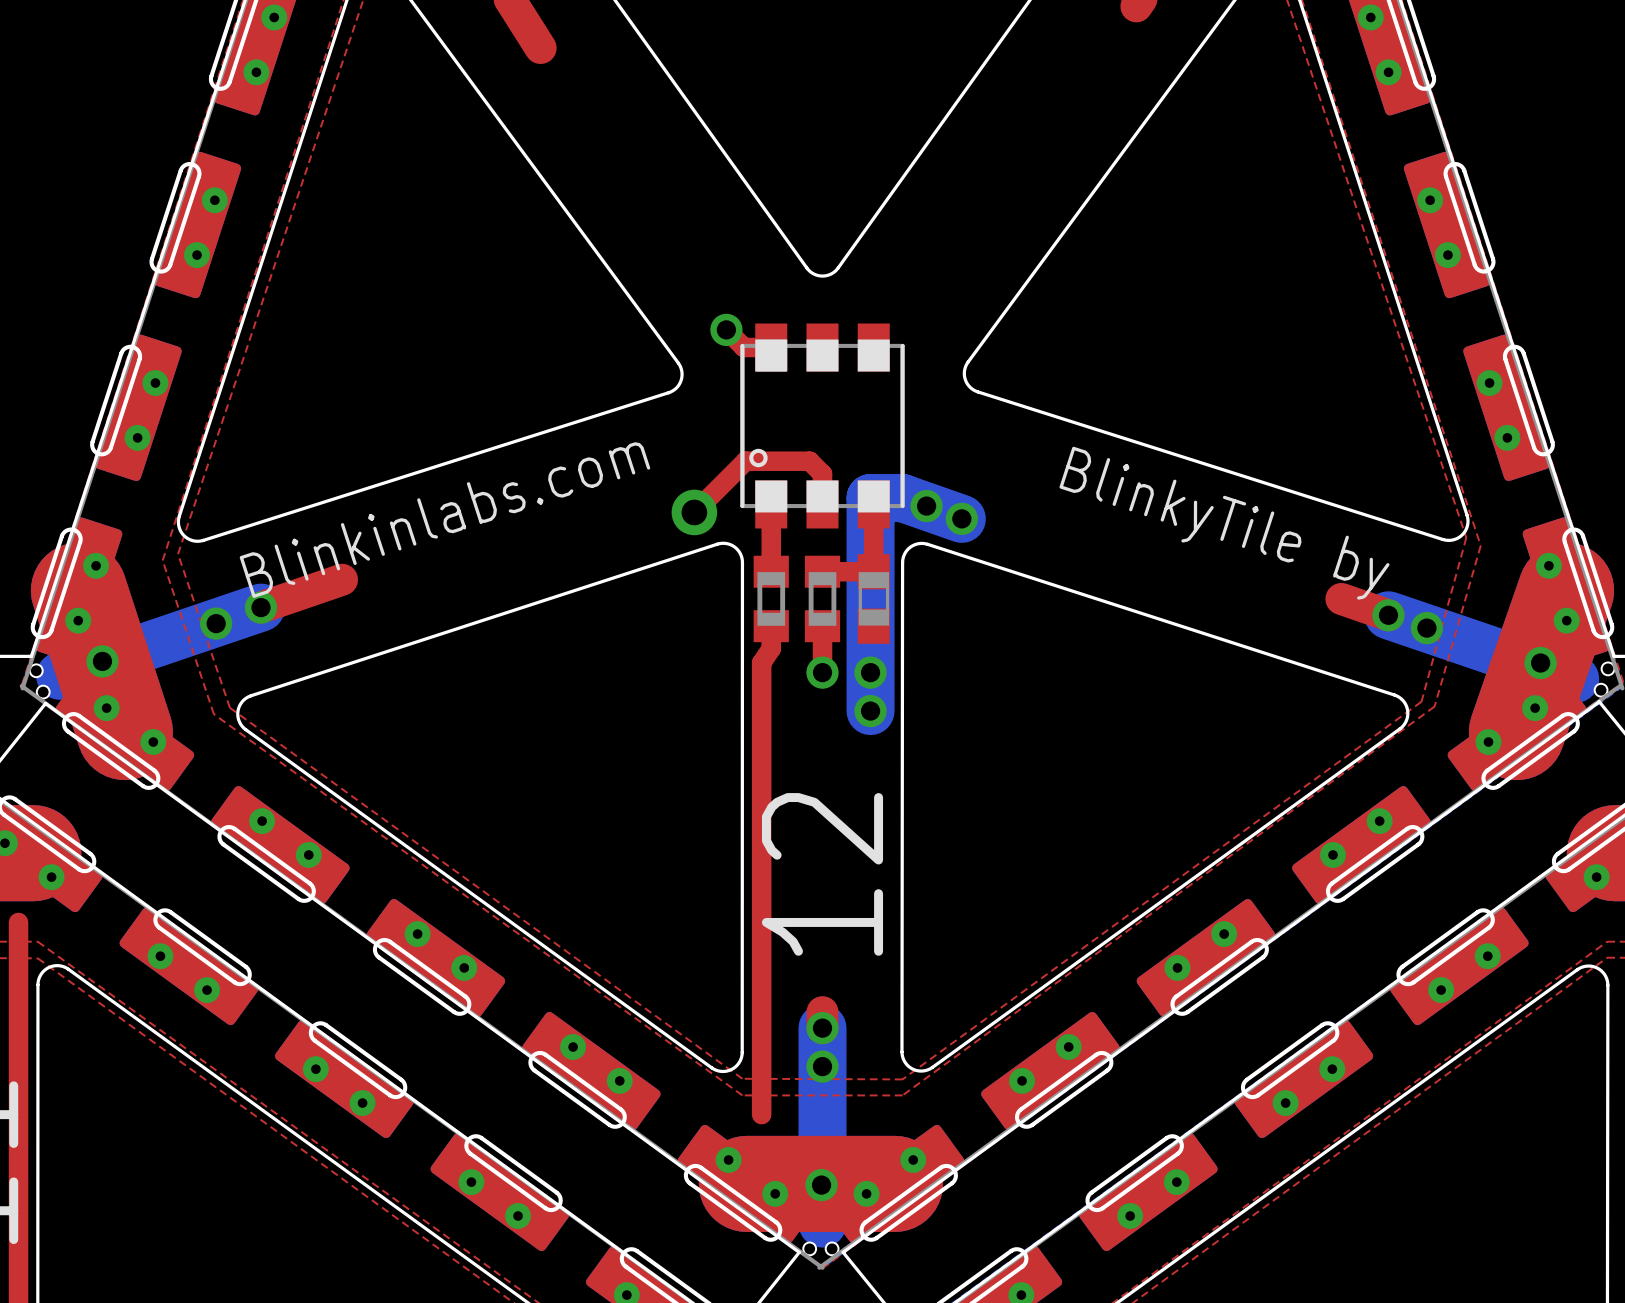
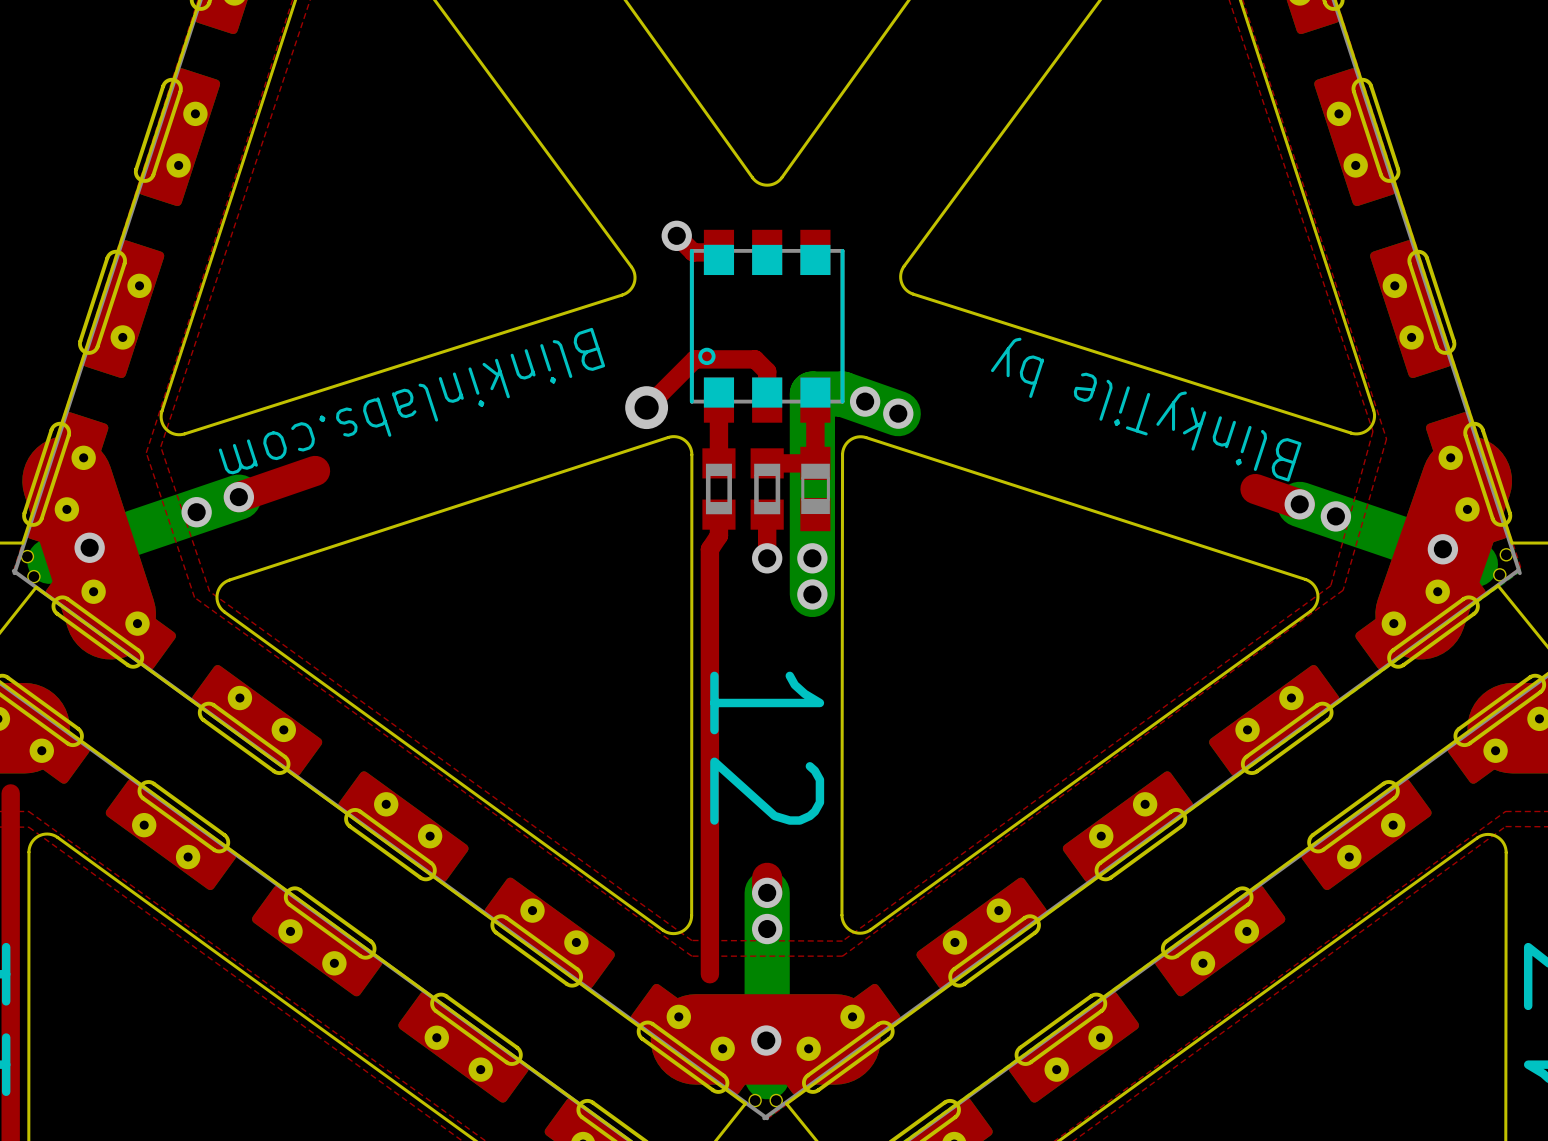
text rotation: 0° (444, 520) -> 180° (411, 401)
text rotation: 0° (1224, 523) -> 180° (1146, 409)
text rotation: 0° (822, 874) -> 180° (767, 748)

